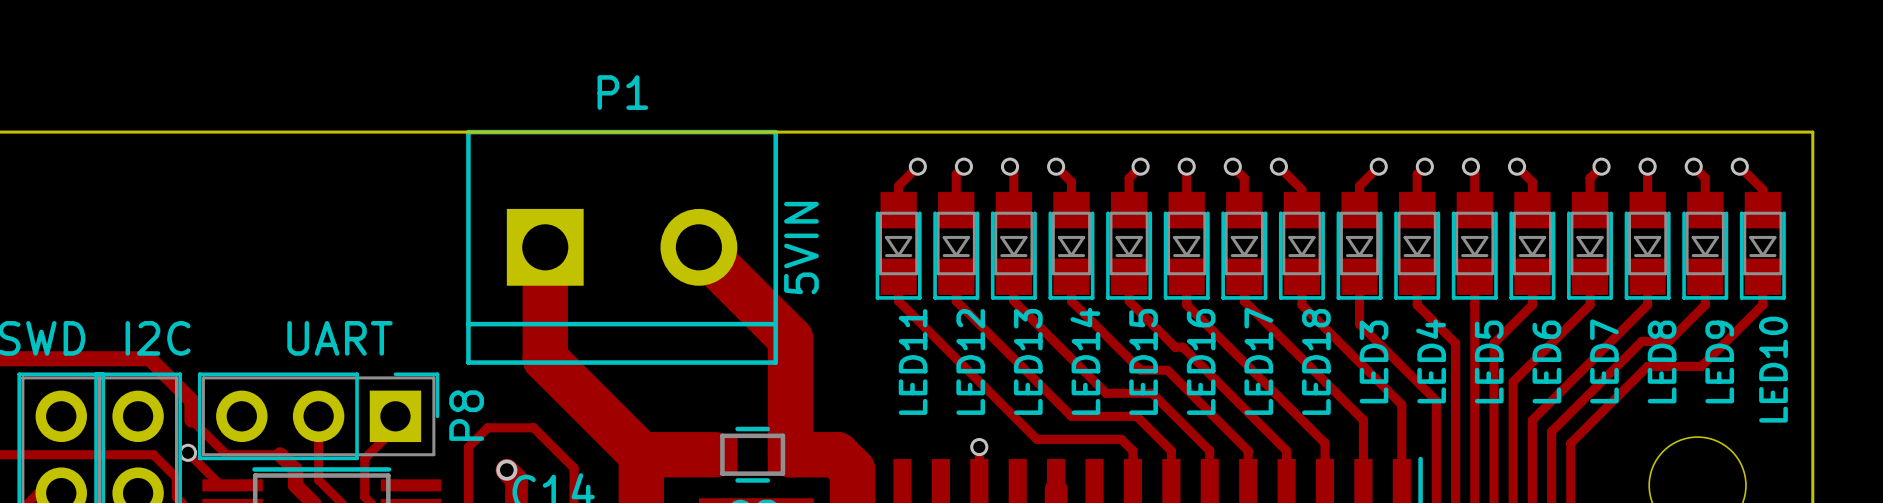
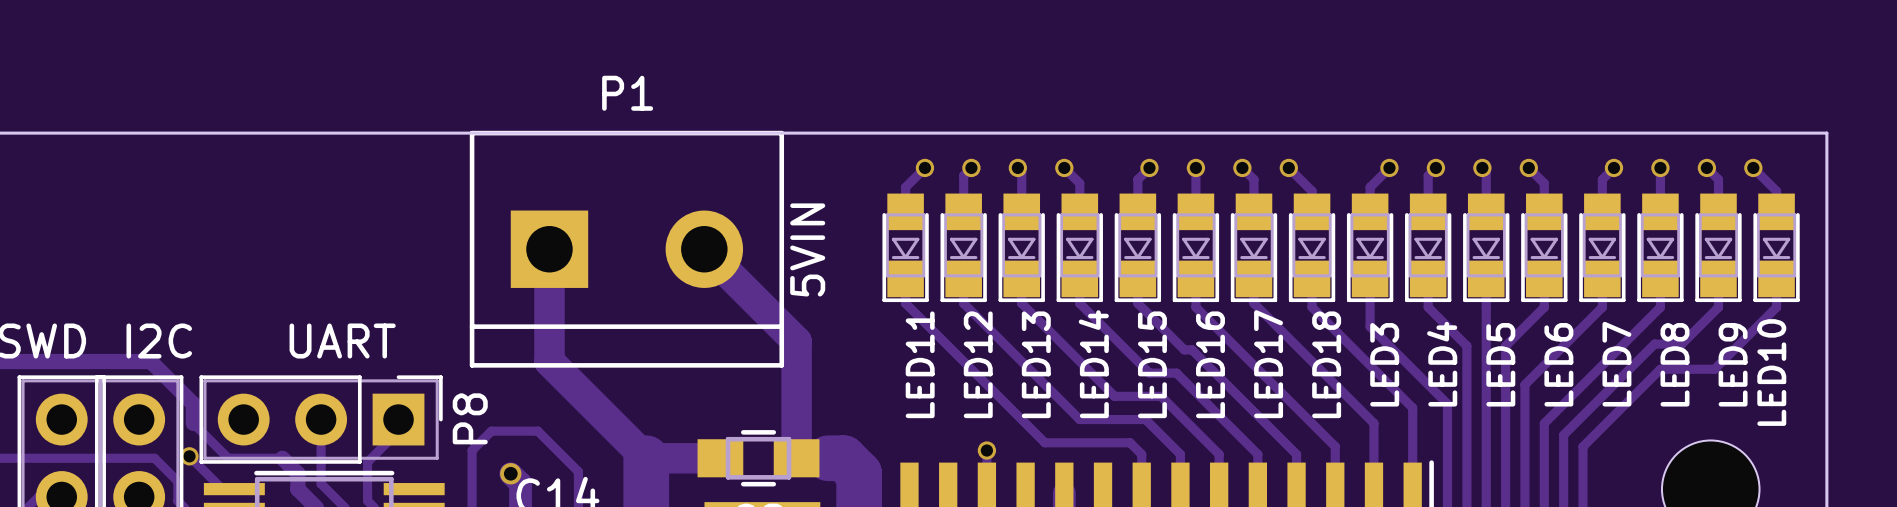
track width: thick (545, 247) (545, 358) (641, 454) (714, 454) -> thin (549, 249) (549, 361) (646, 458) (720, 458)
track width: thick (698, 247) (790, 338) (790, 454) (821, 454) -> thin (704, 249) (796, 341) (796, 458) (828, 458)
LED10 name position: LED10 (1773, 369) -> LED10 (1771, 372)

